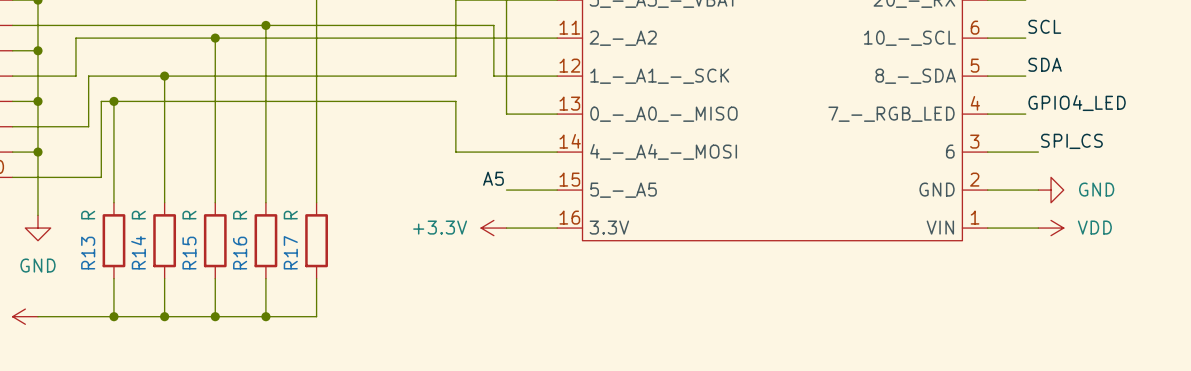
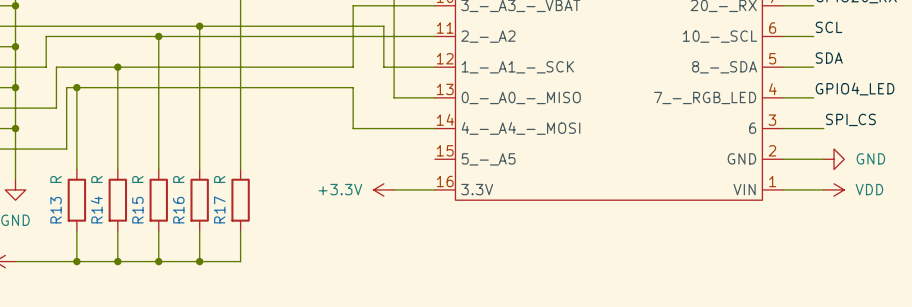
label: A5 (493, 178) -> none
wire: (506, 190) (557, 190) -> none

